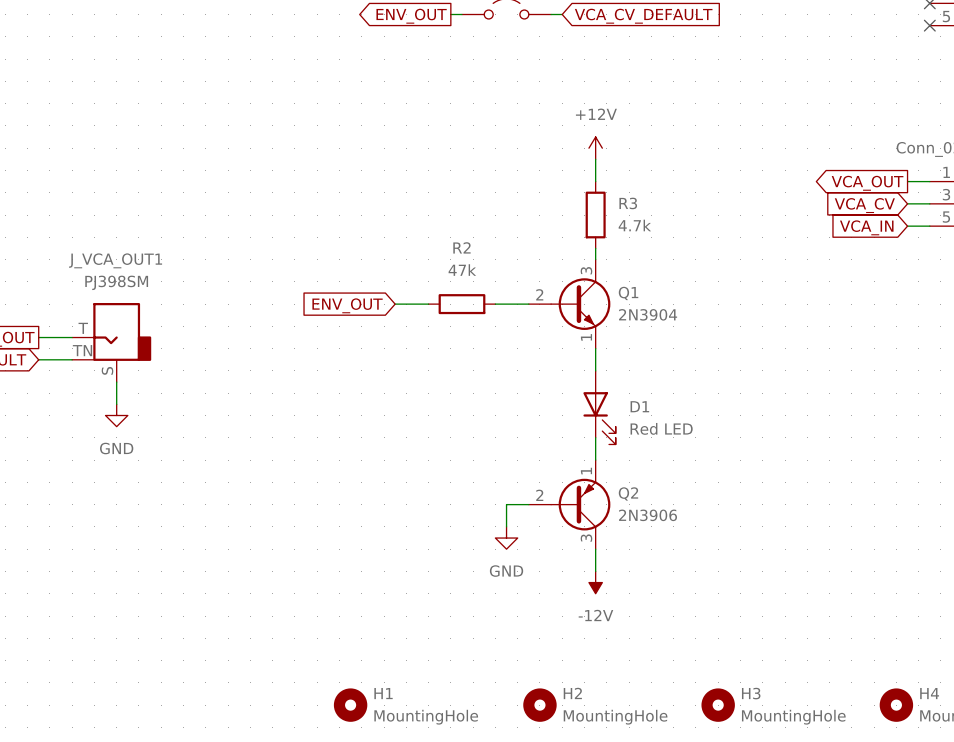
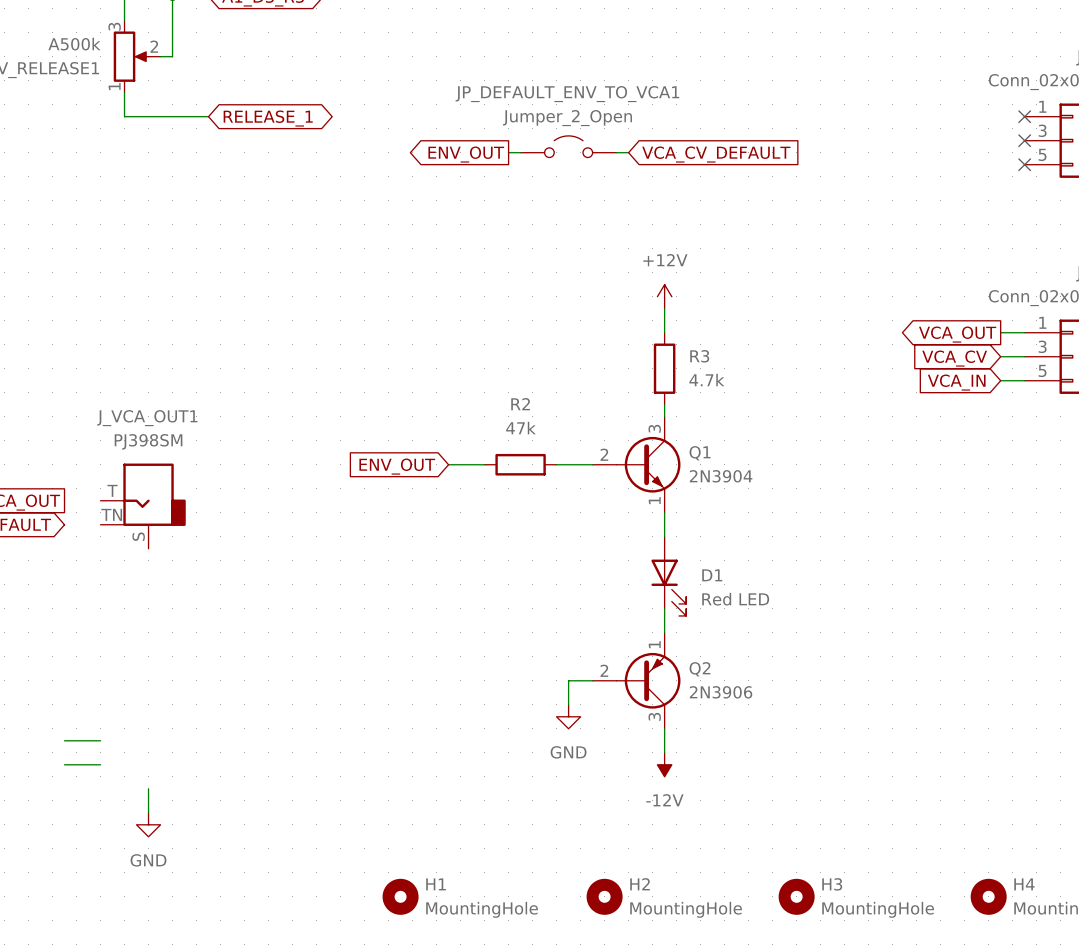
wire: (38, 337) (72, 337) -> none
wire: (38, 359) (72, 359) -> (64, 740) (100, 740)
wire: (116, 382) (116, 404) -> none
power symbol: GND (116, 415) -> none
wire: none -> (64, 764) (100, 764)
wire: none -> (148, 788) (148, 812)
power symbol: none -> GND (148, 824)

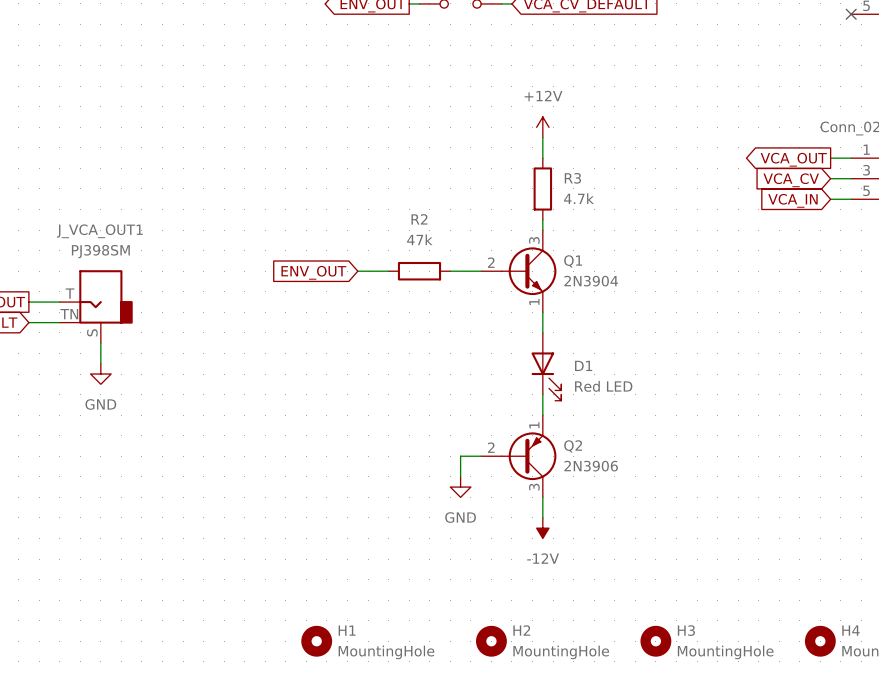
wire: none -> (28, 302) (59, 302)
wire: none -> (100, 343) (100, 363)
power symbol: none -> GND (100, 374)
wire: (64, 740) (100, 740) -> (28, 322) (59, 322)
wire: (64, 764) (100, 764) -> none
wire: (148, 788) (148, 812) -> none
power symbol: GND (148, 824) -> none

